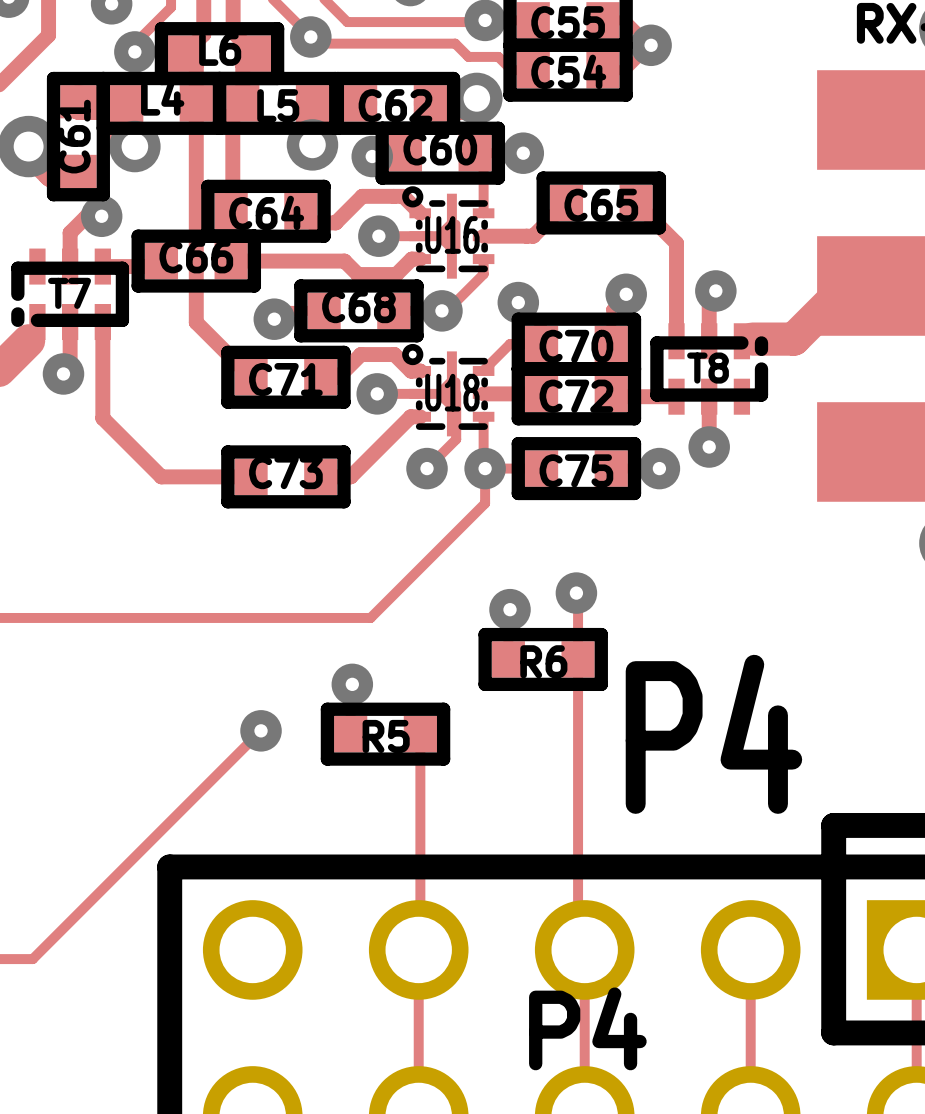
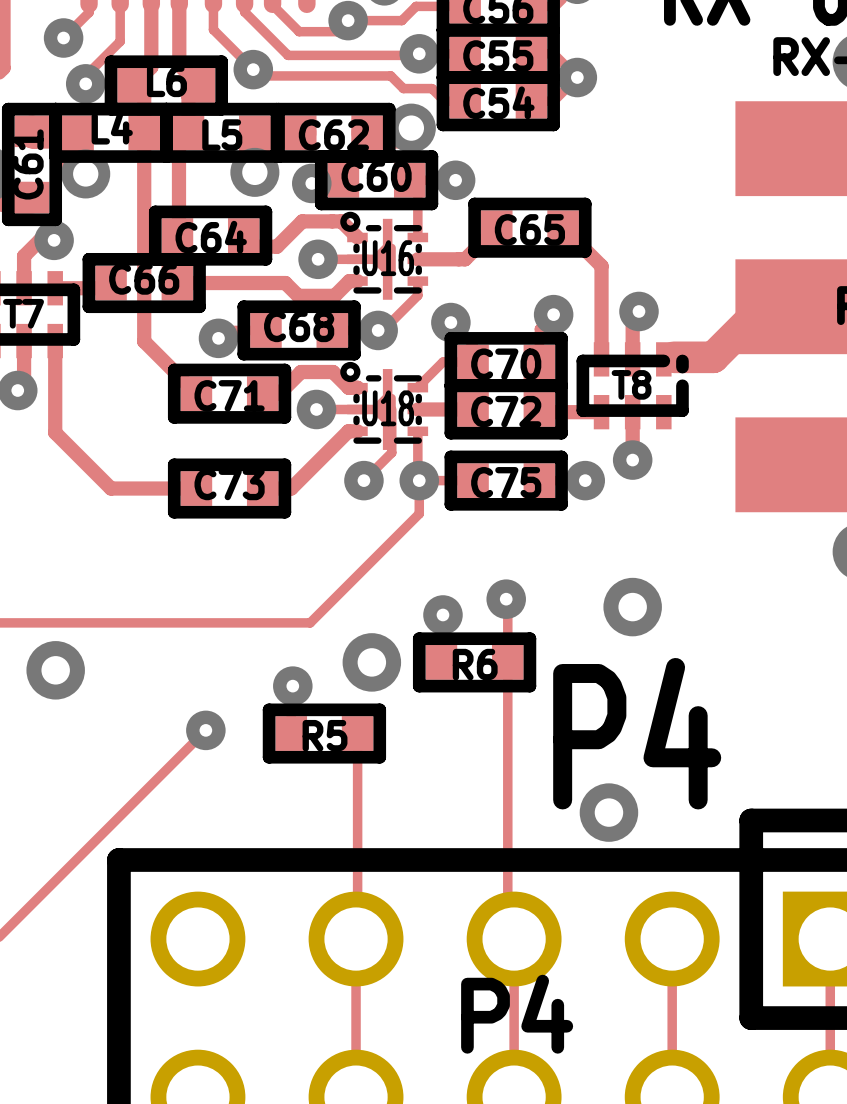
via: none -> (632, 607)
via: none -> (371, 662)
via: none -> (55, 670)
via: none -> (608, 812)

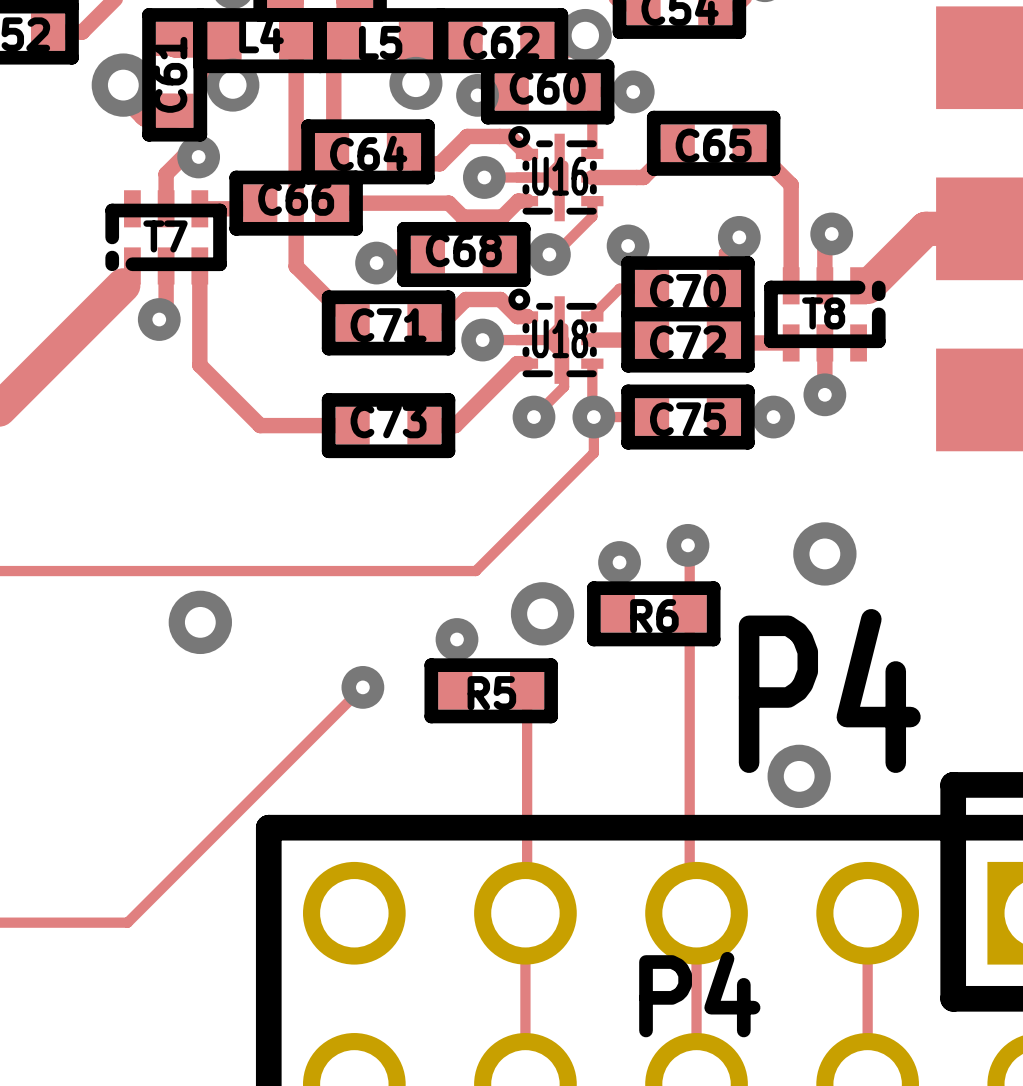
track: (763, 306) (713, 357) (673, 357) (671, 359) (663, 359) -> (966, 228) (925, 228) (867, 287) (858, 285)

